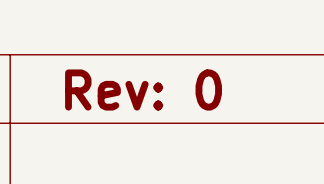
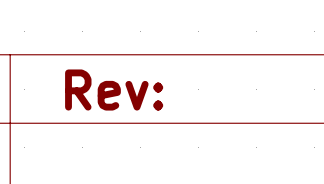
title block: Rev: 0 (143, 90) -> Rev: (114, 90)

